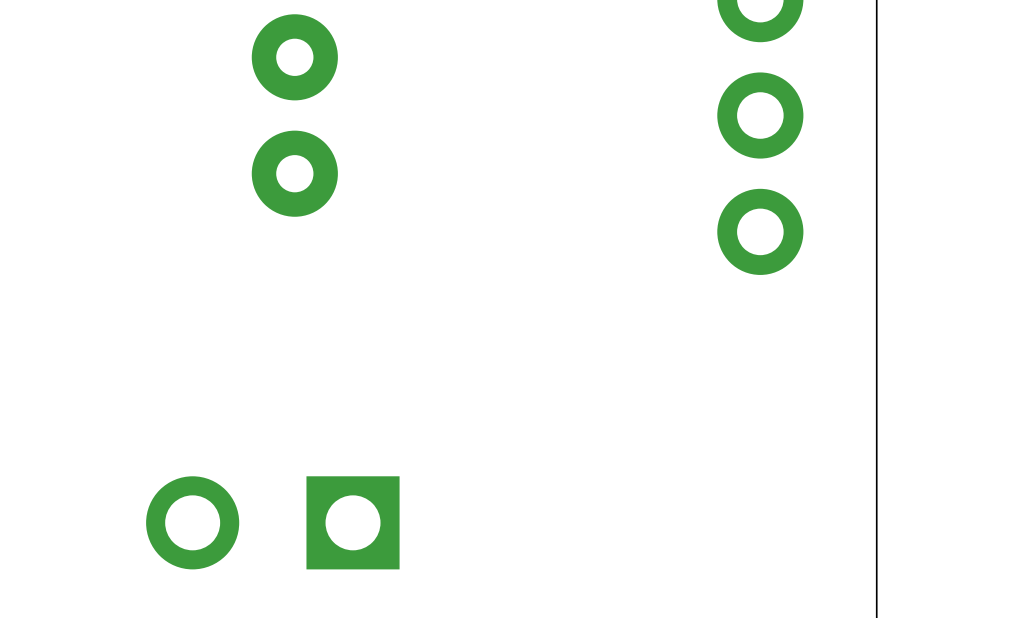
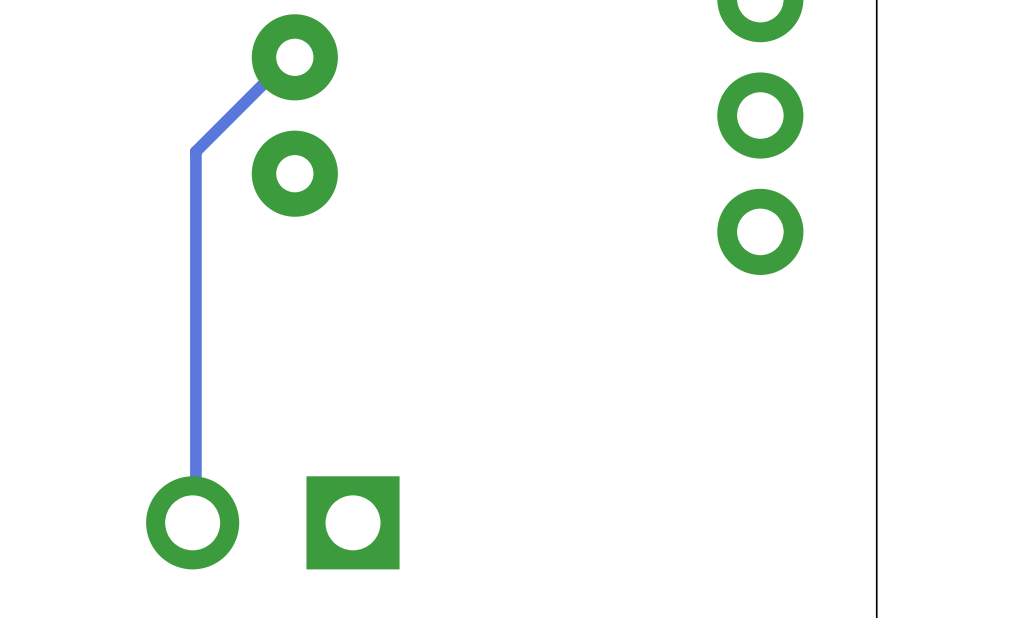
track: none -> (294, 57) (290, 57) (195, 151) (195, 518) (192, 522)

